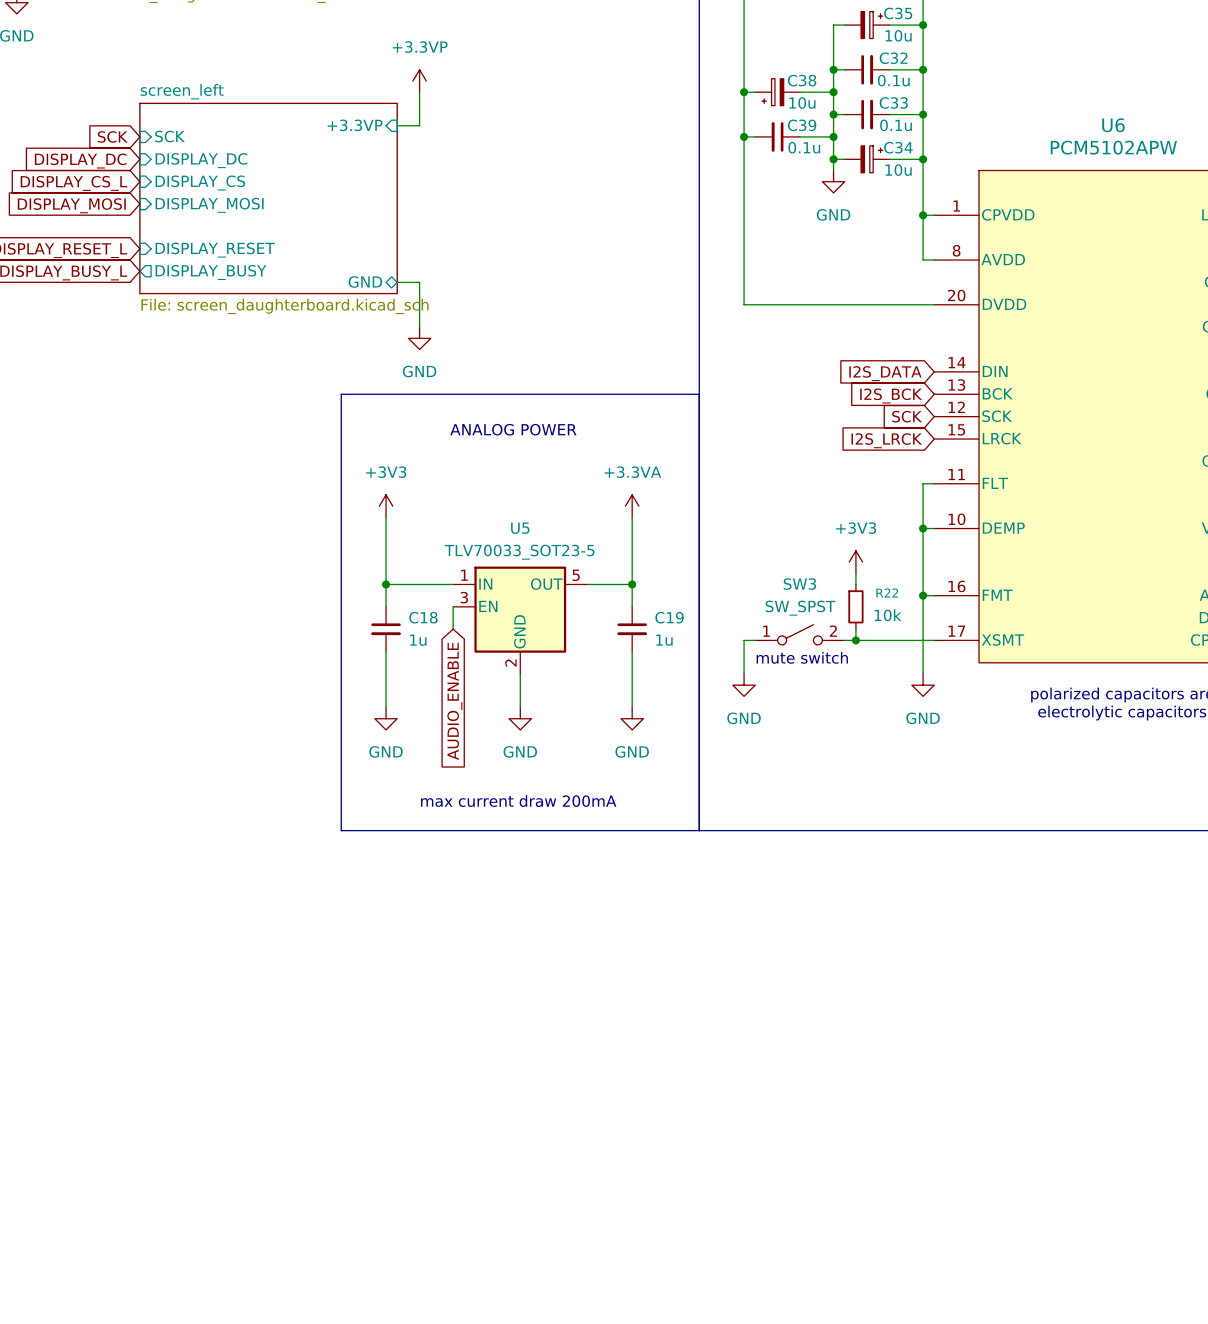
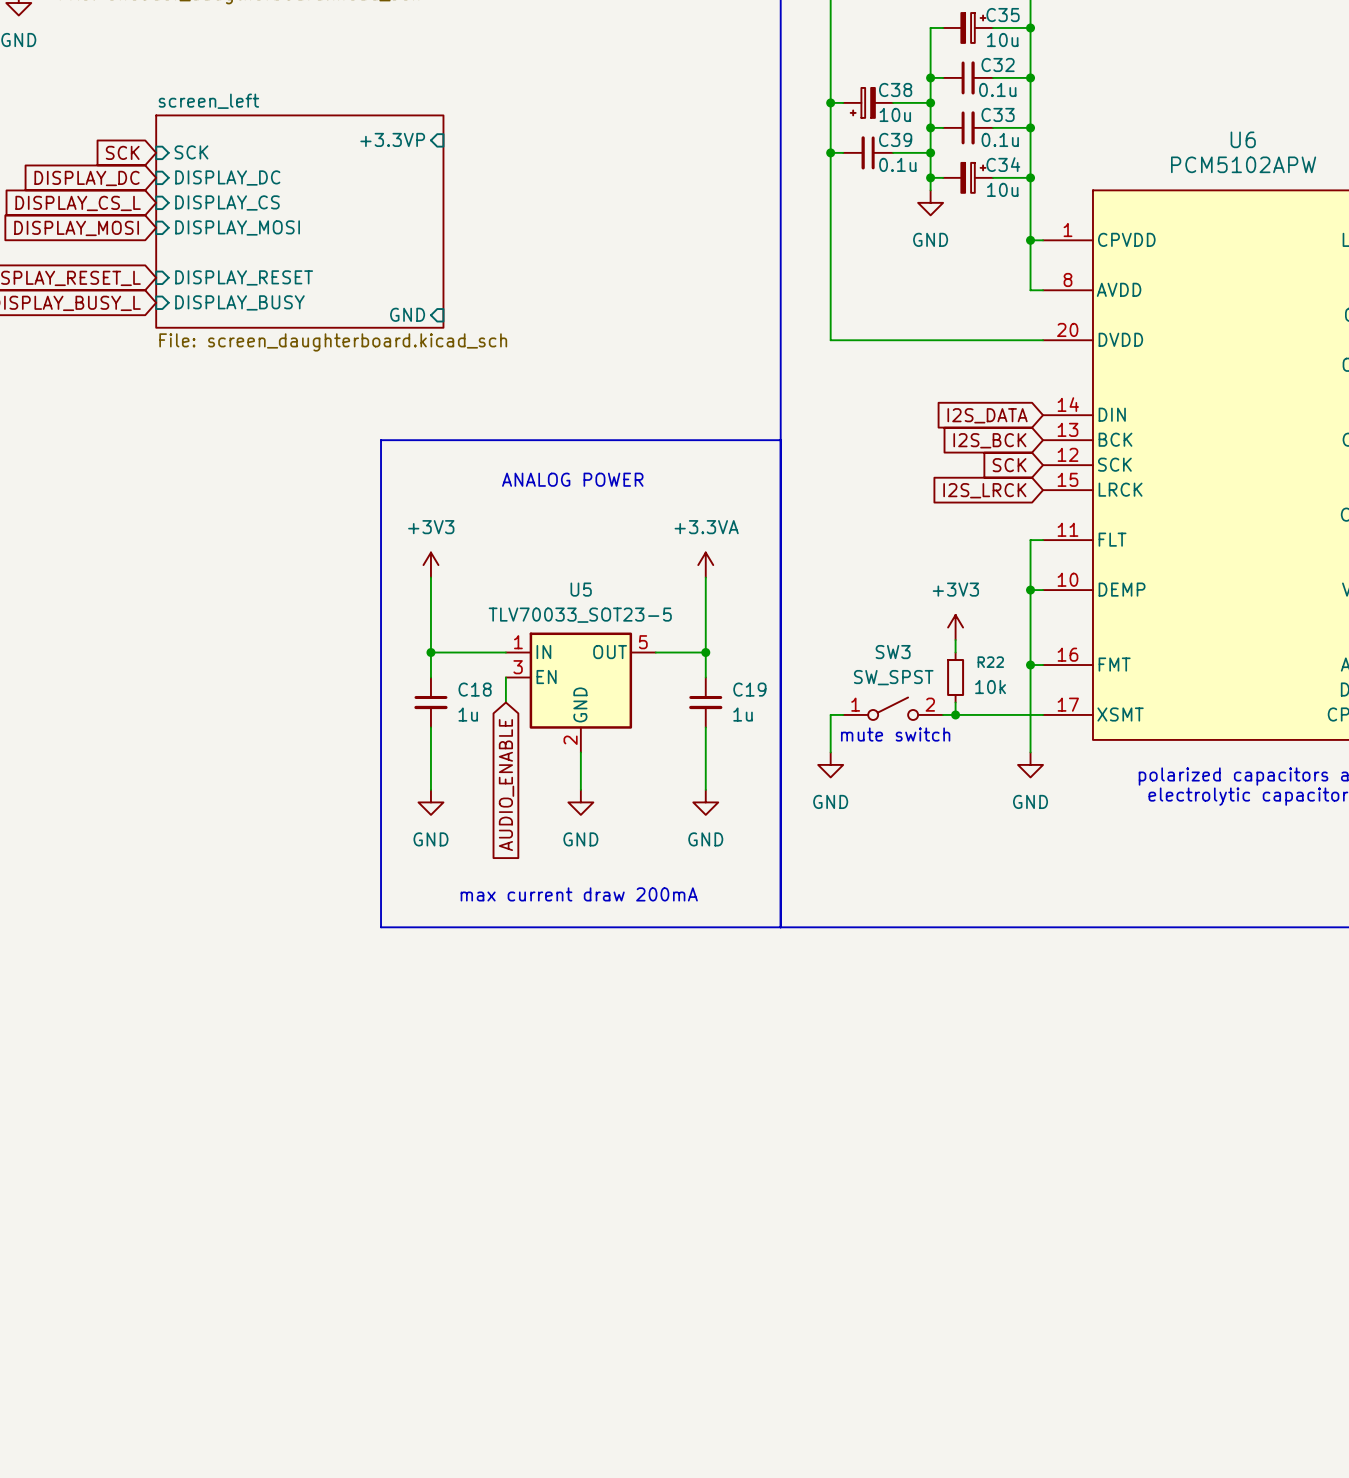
power symbol: +3.3VP (419, 81) -> none
wire: (419, 92) (419, 125) (397, 125) -> none
sheet pin shape: output (211, 272) -> input (239, 302)
sheet pin shape: bidirectional (365, 281) -> input (407, 314)
wire: (397, 282) (419, 282) (419, 327) -> none
power symbol: GND (419, 338) -> none

